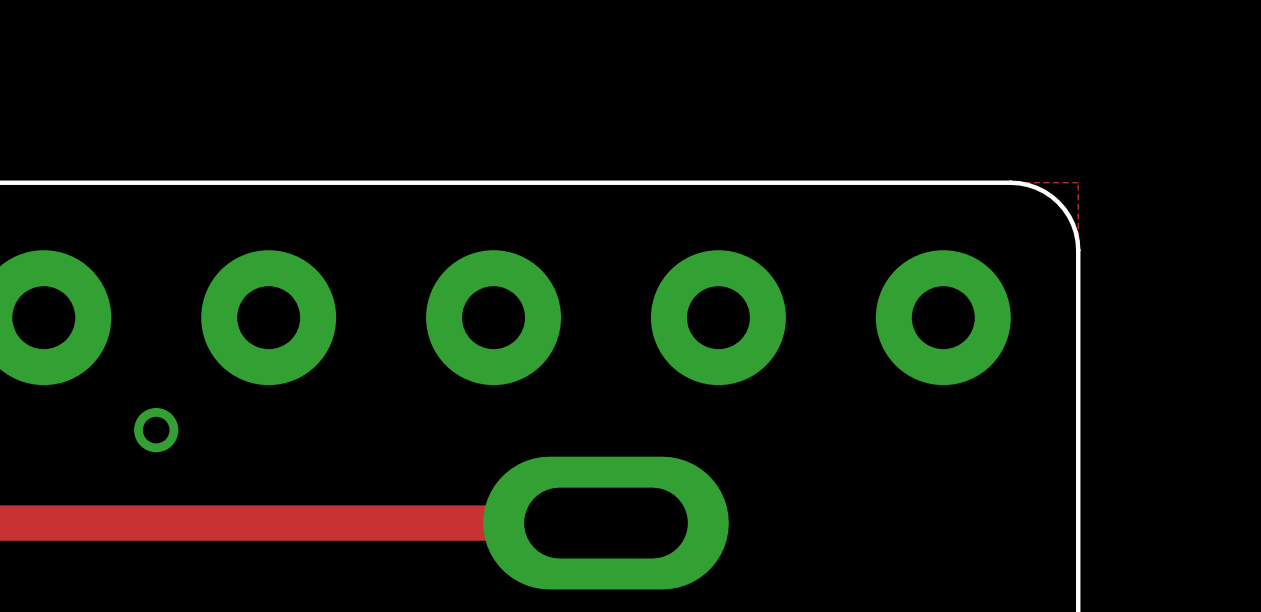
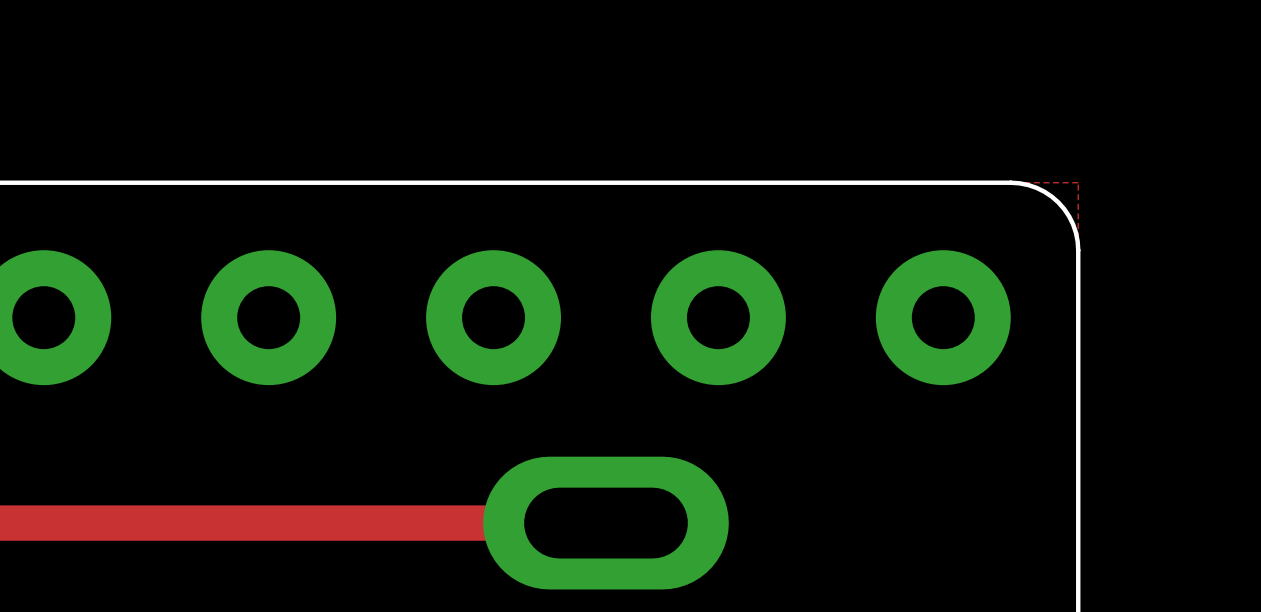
via: (156, 430) -> none

